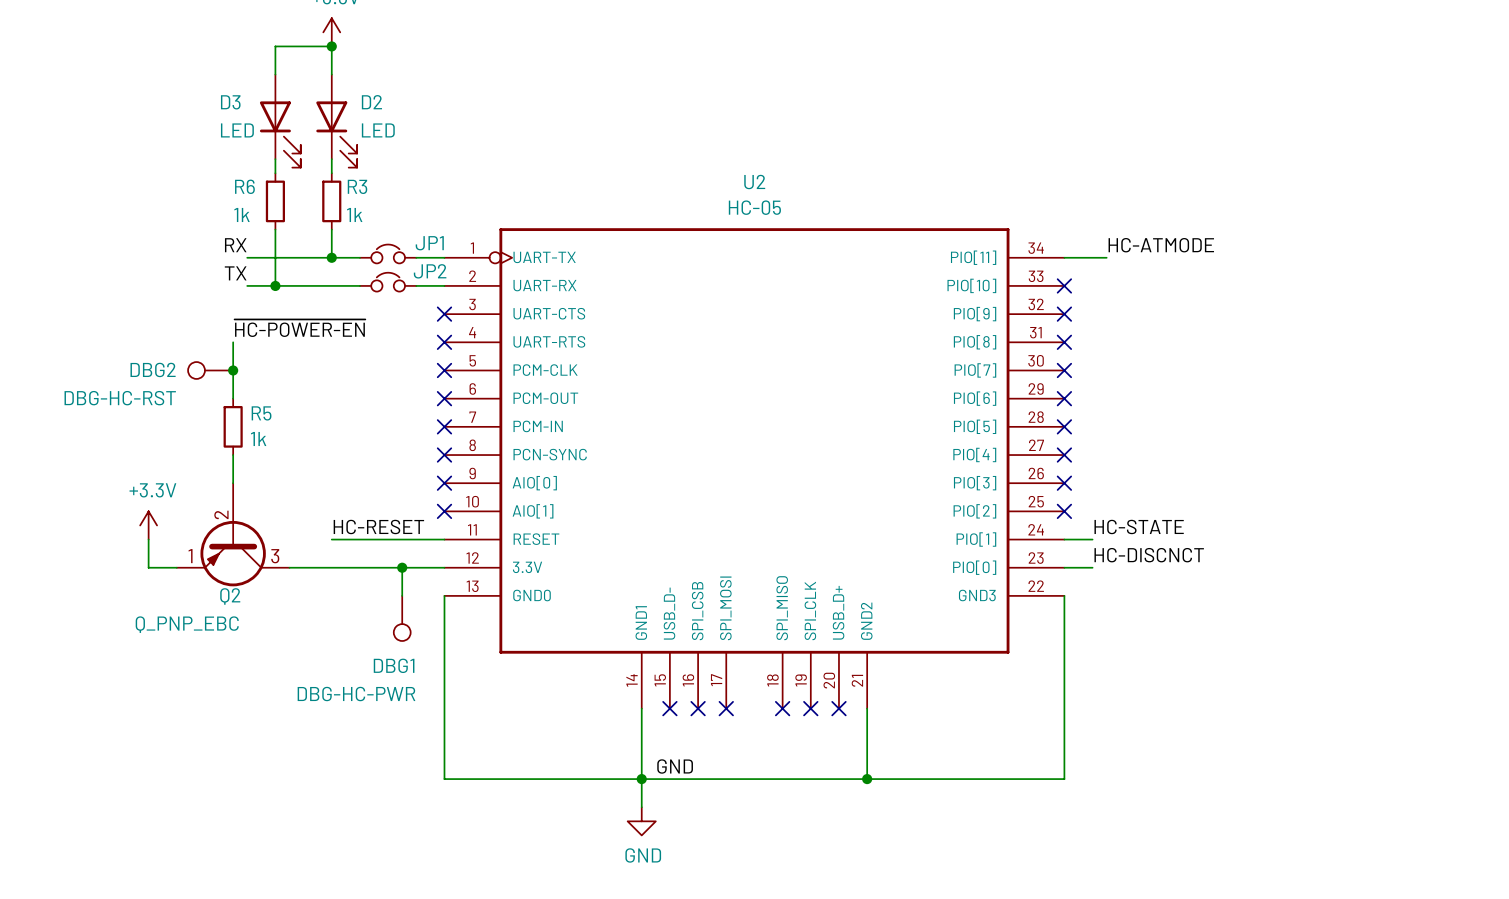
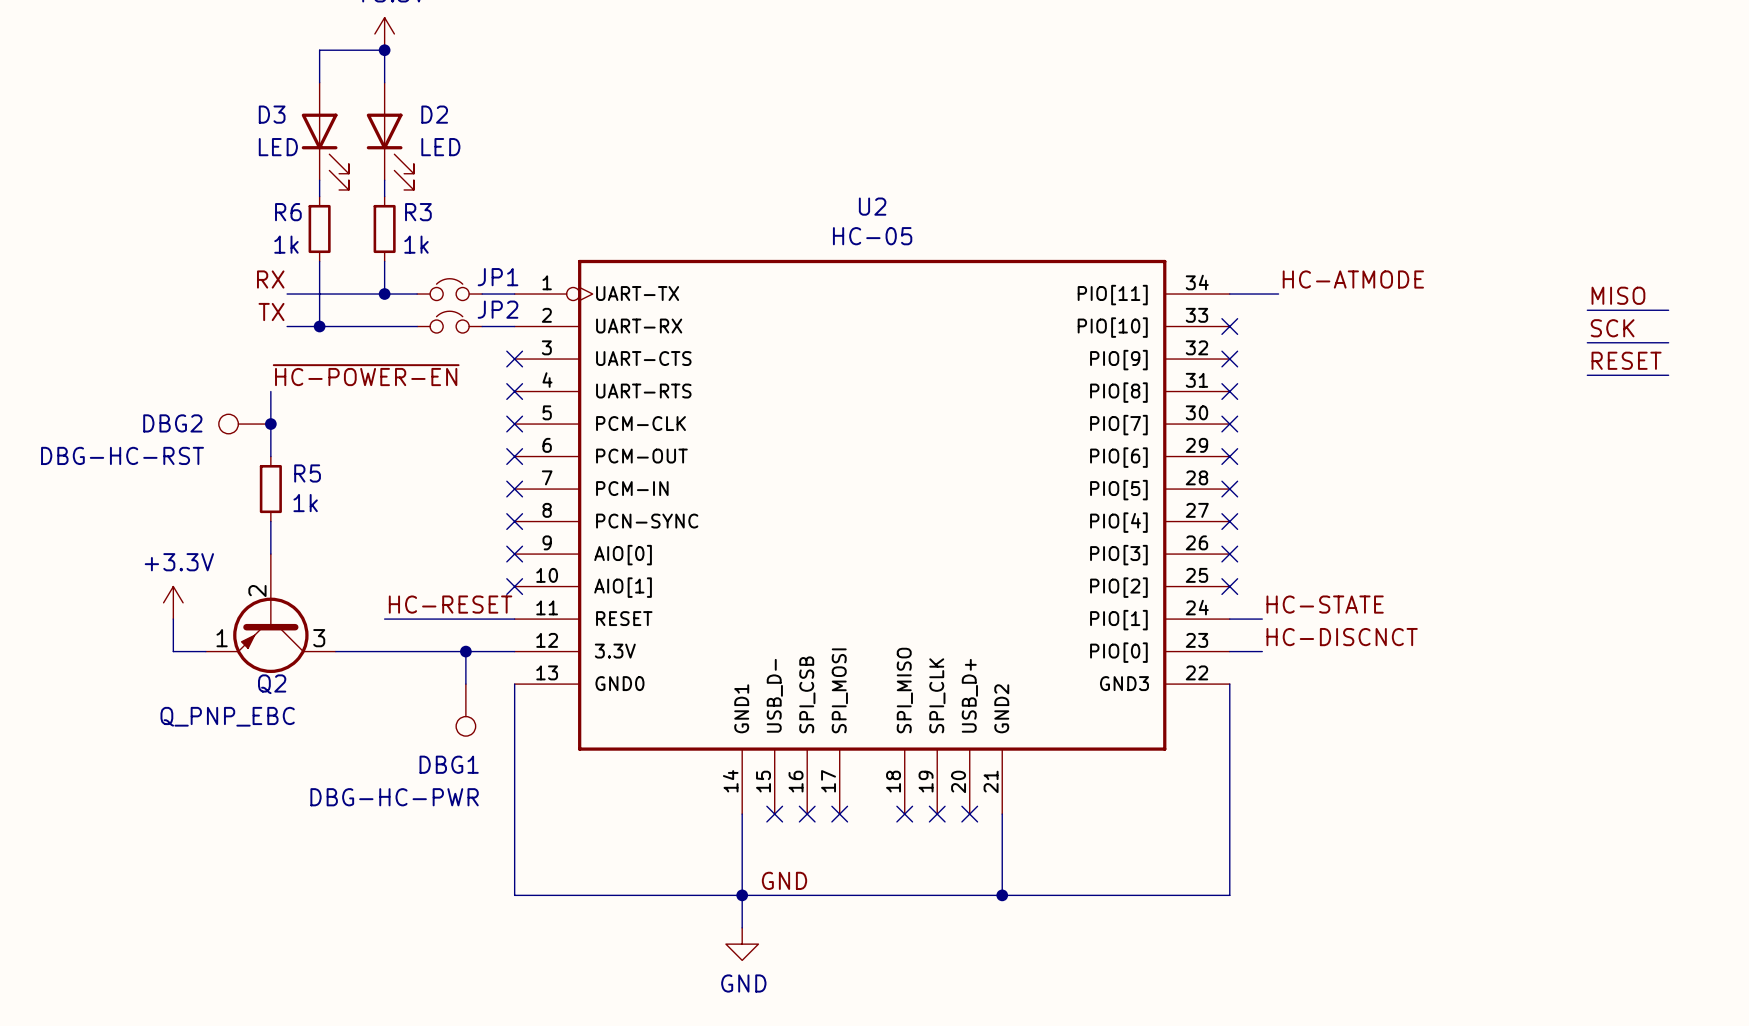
label: none -> MISO (1618, 295)
wire: none -> (1587, 310) (1668, 310)
label: none -> SCK (1612, 328)
wire: none -> (1587, 342) (1668, 342)
label: none -> RESET (1626, 360)
wire: none -> (1587, 375) (1668, 375)

